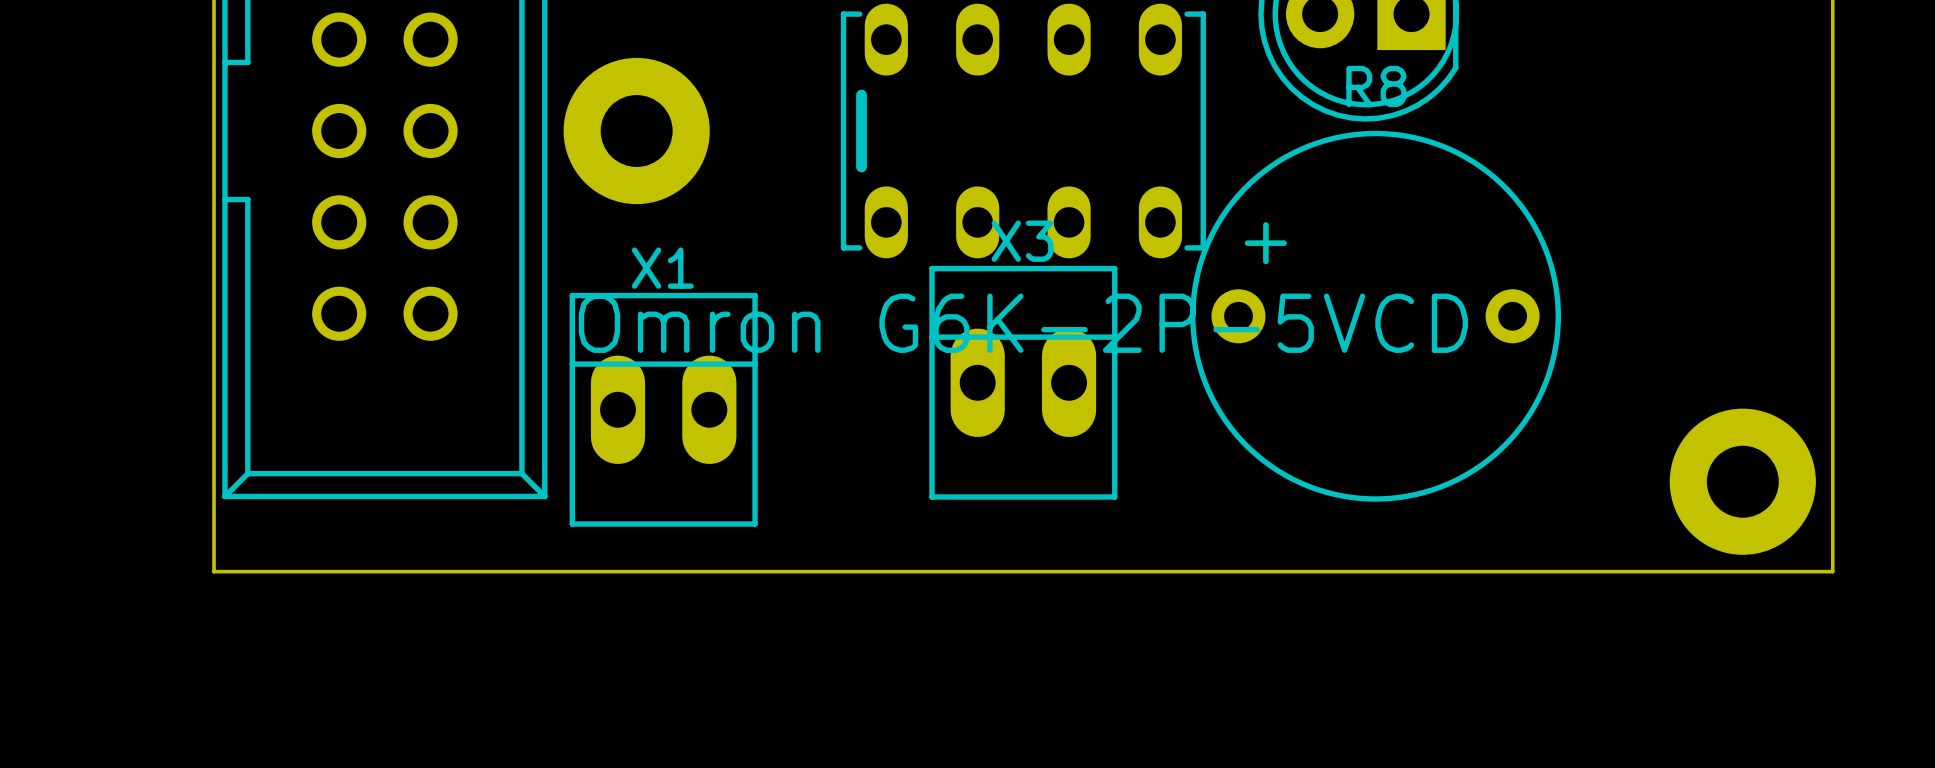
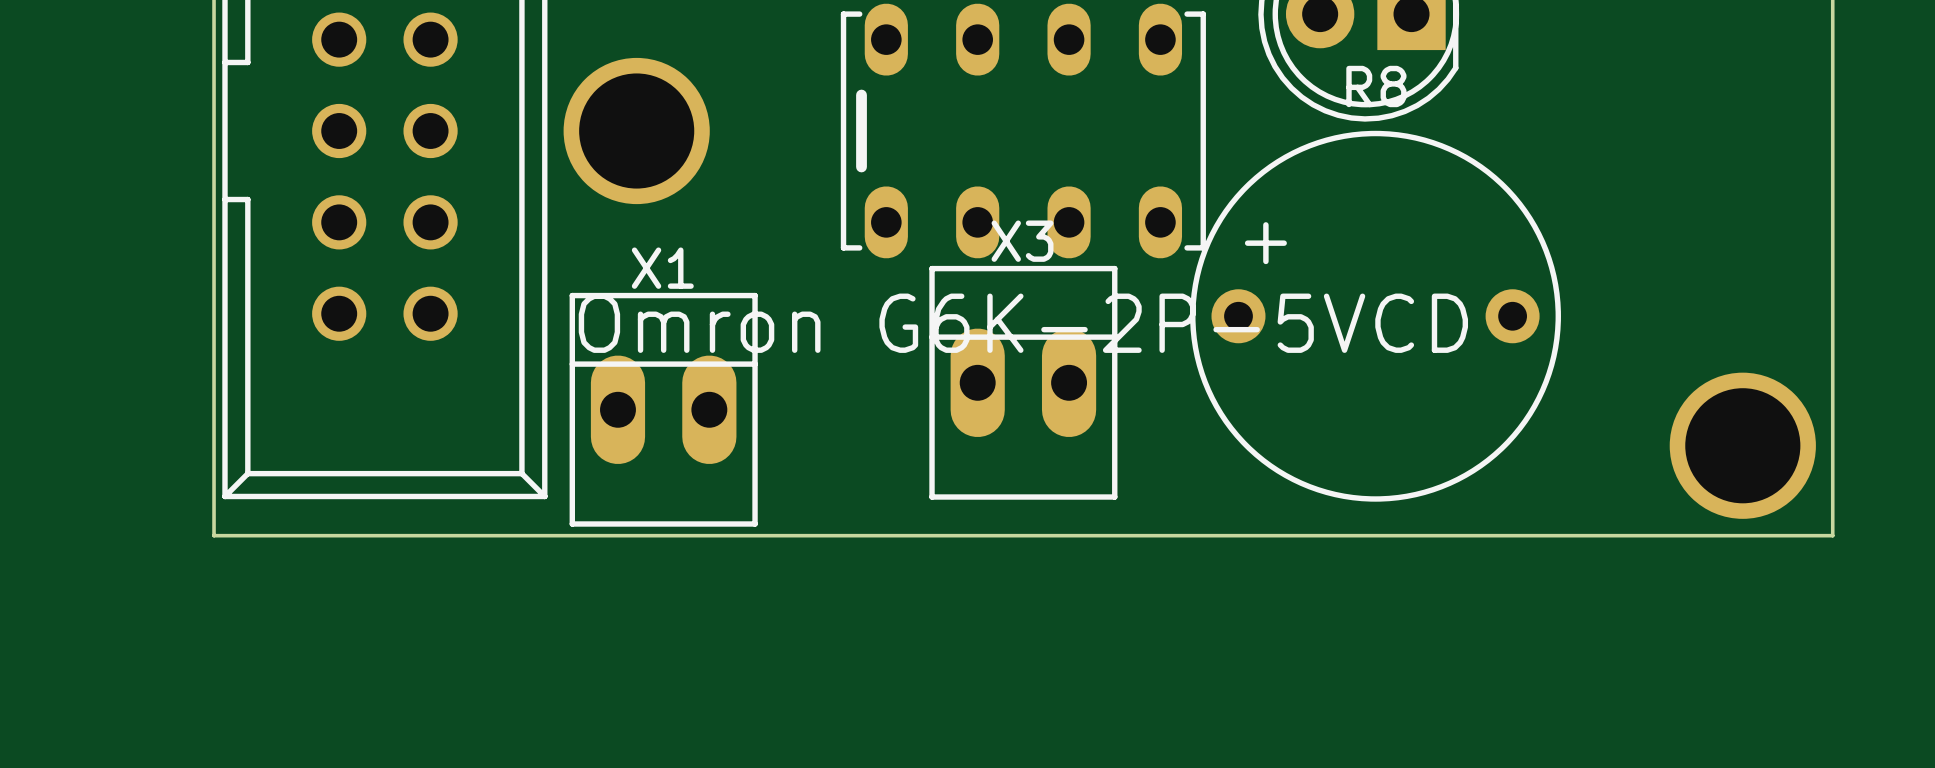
part footprint: [563, 57, 710, 205] -> [563, 57, 710, 205]
part footprint: [1669, 408, 1816, 555] -> [1669, 372, 1816, 519]
board edge: (1832, 535) (1832, 571) (214, 571) (214, 535) -> (1832, 535) (214, 535)

